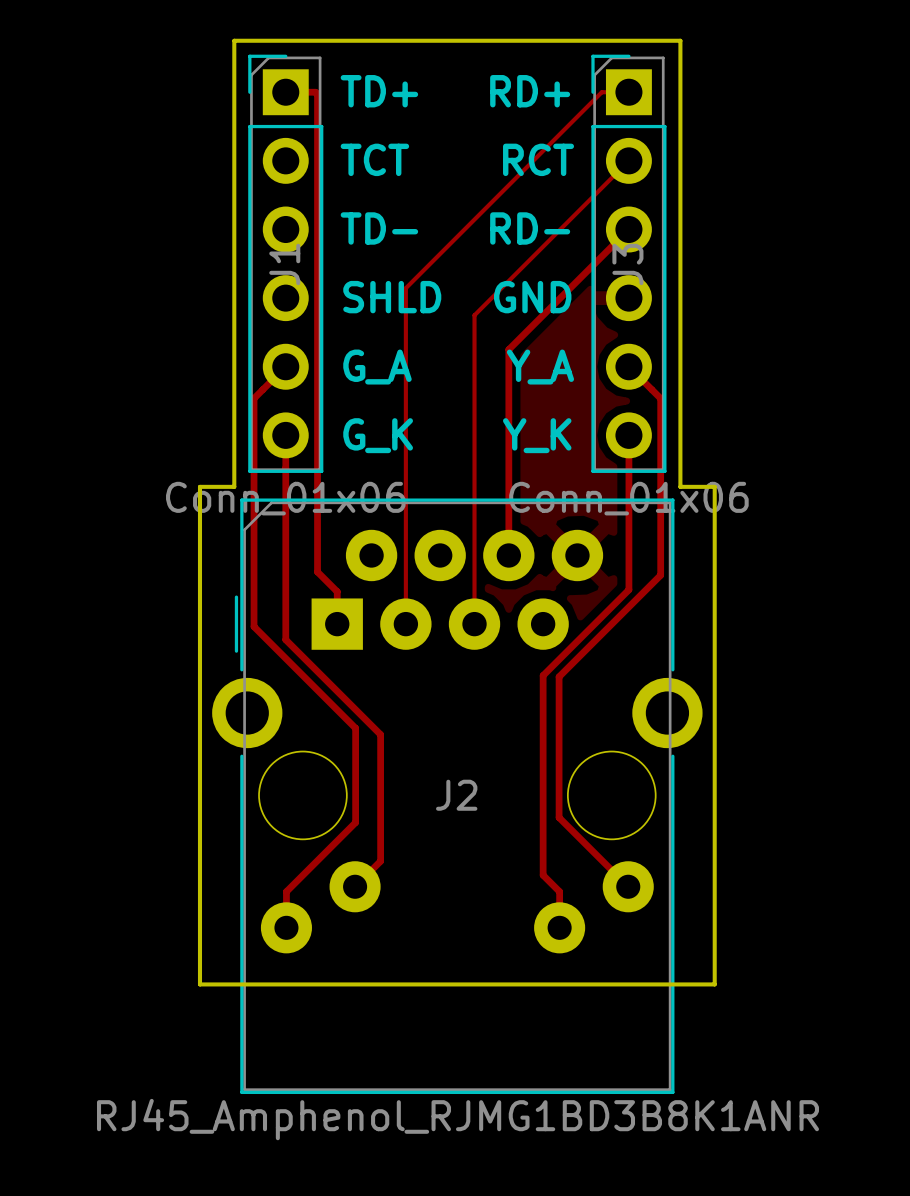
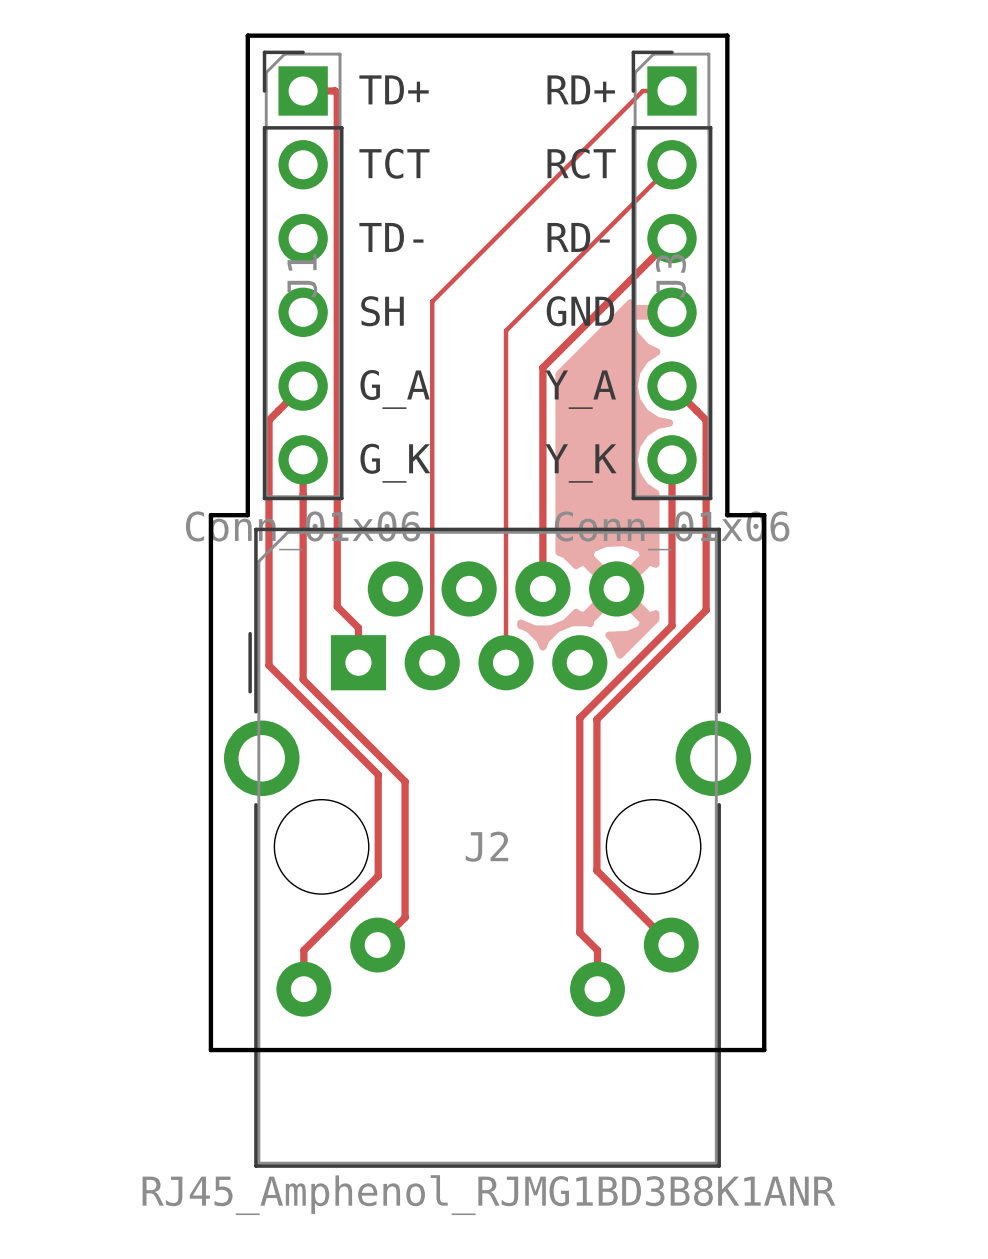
text: SHLD (392, 297) -> SH (382, 311)

